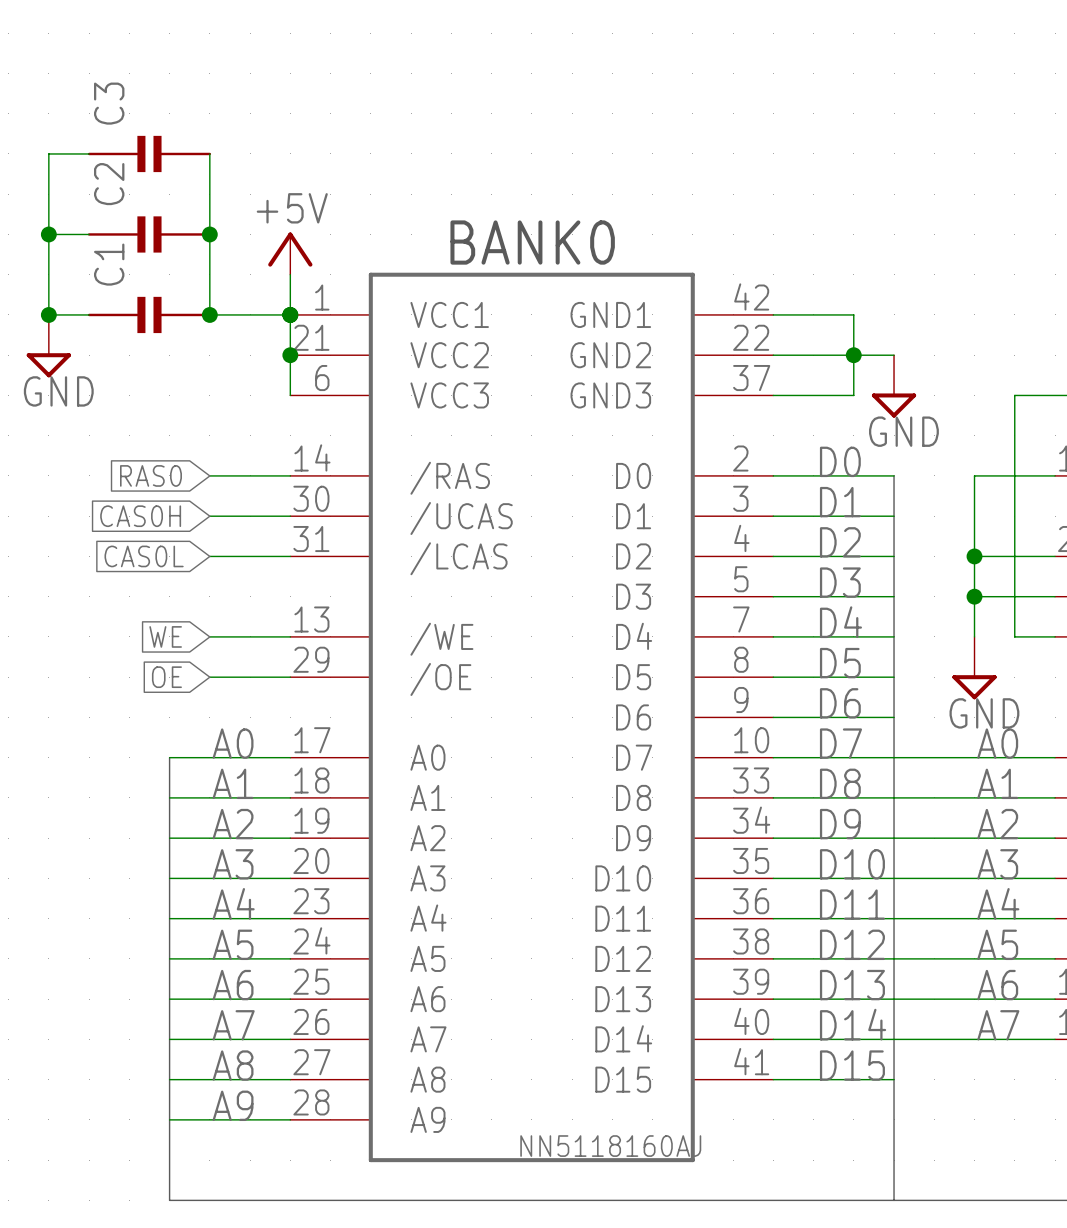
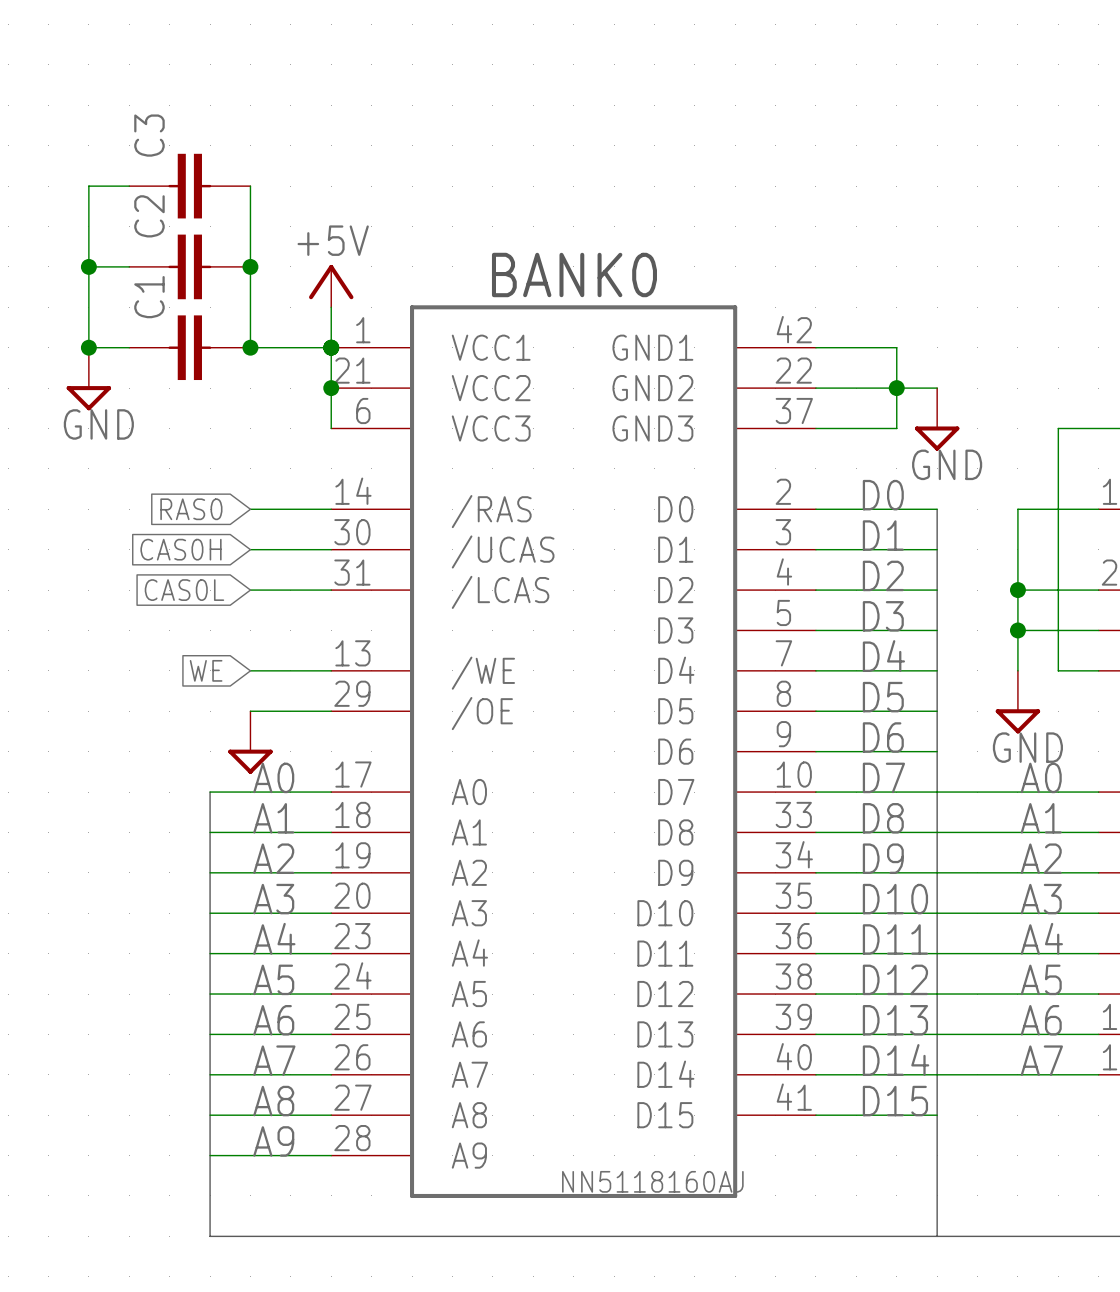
C3 symbol: [87, 135, 212, 173] -> [129, 153, 251, 219]
C2 symbol: [87, 216, 212, 253] -> [129, 234, 251, 300]
C1 symbol: [87, 296, 212, 334] -> [129, 315, 251, 381]
global label: OE (166, 677) -> none
power symbol: none -> (250, 742)

